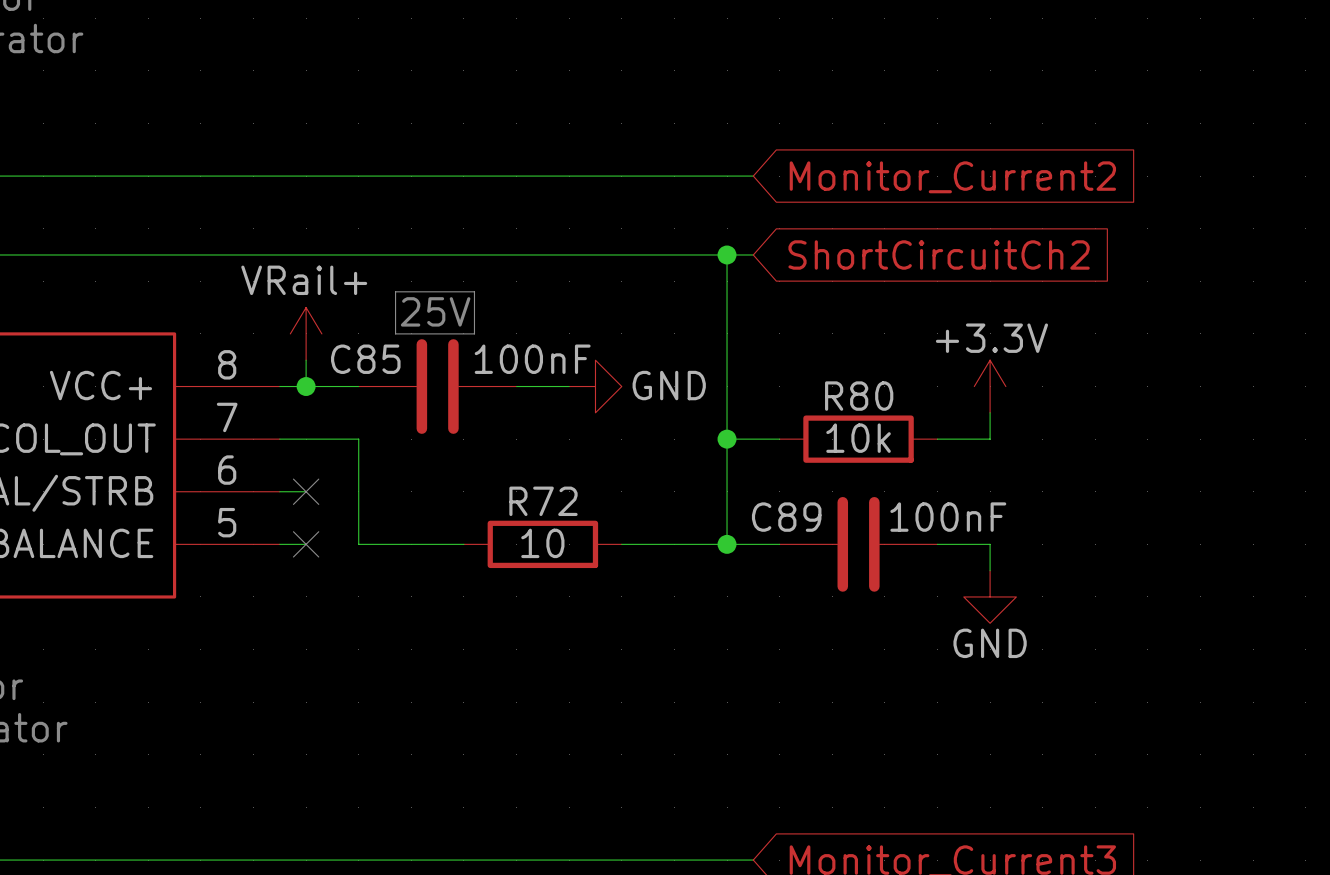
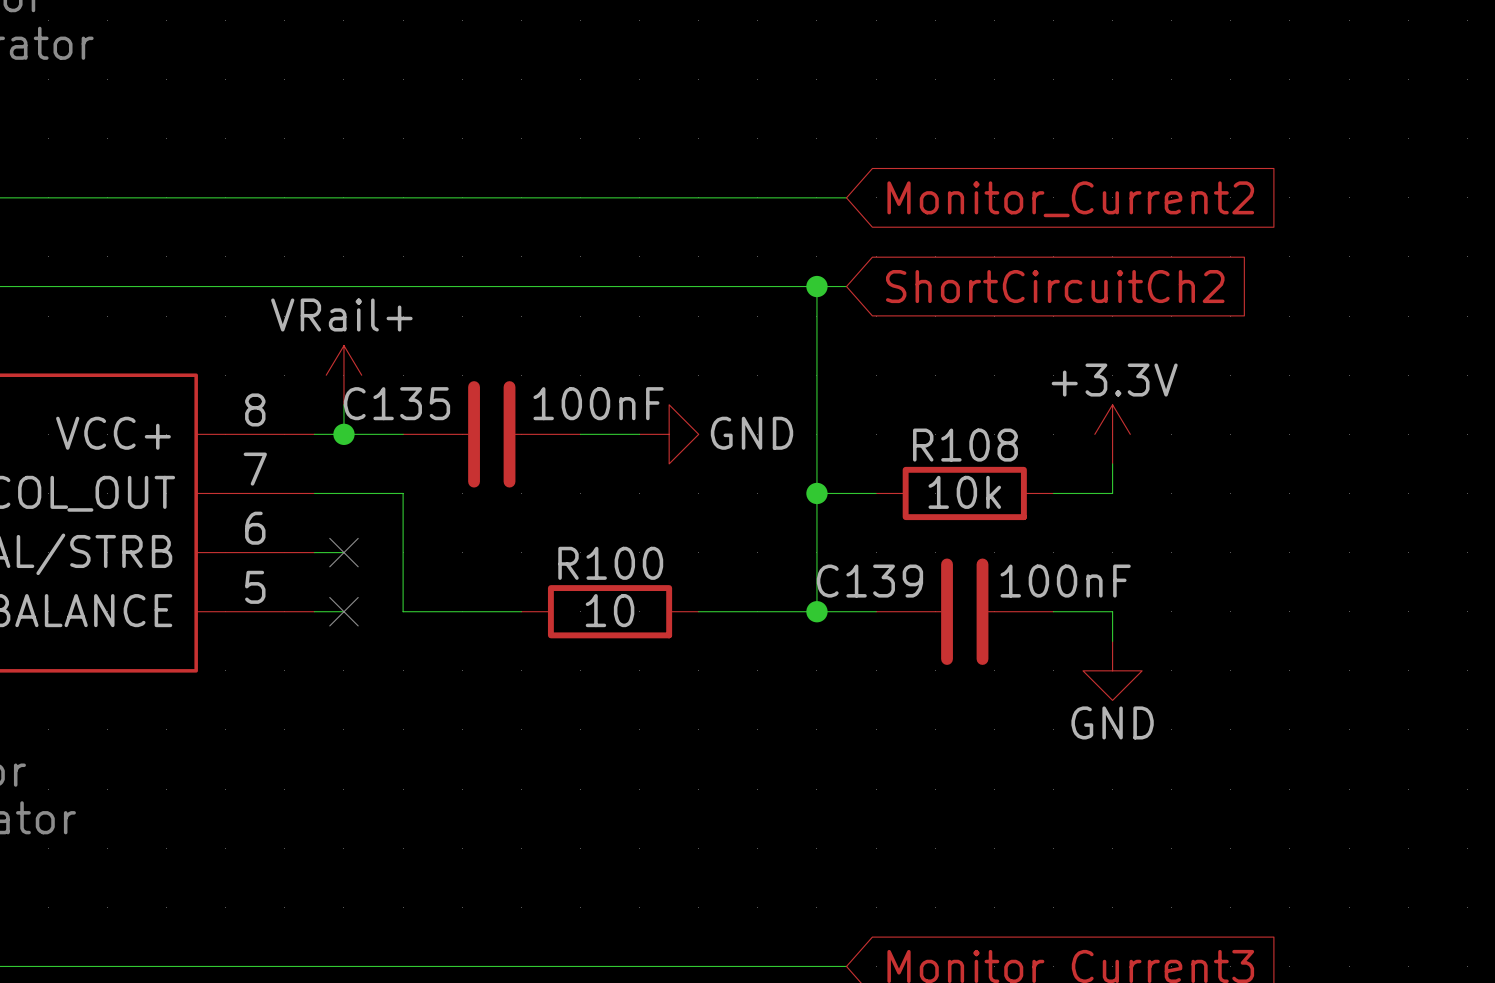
line: (395, 291) (474, 291) (474, 333) (395, 333) (395, 291) -> none
text: 25V (435, 311) -> none
C85 name: C85 (365, 359) -> C135 (396, 403)
R80 name: R80 (859, 396) -> R108 (965, 445)
R72 name: R72 (543, 501) -> R100 (610, 563)
C89 name: C89 (786, 517) -> C139 (869, 581)

